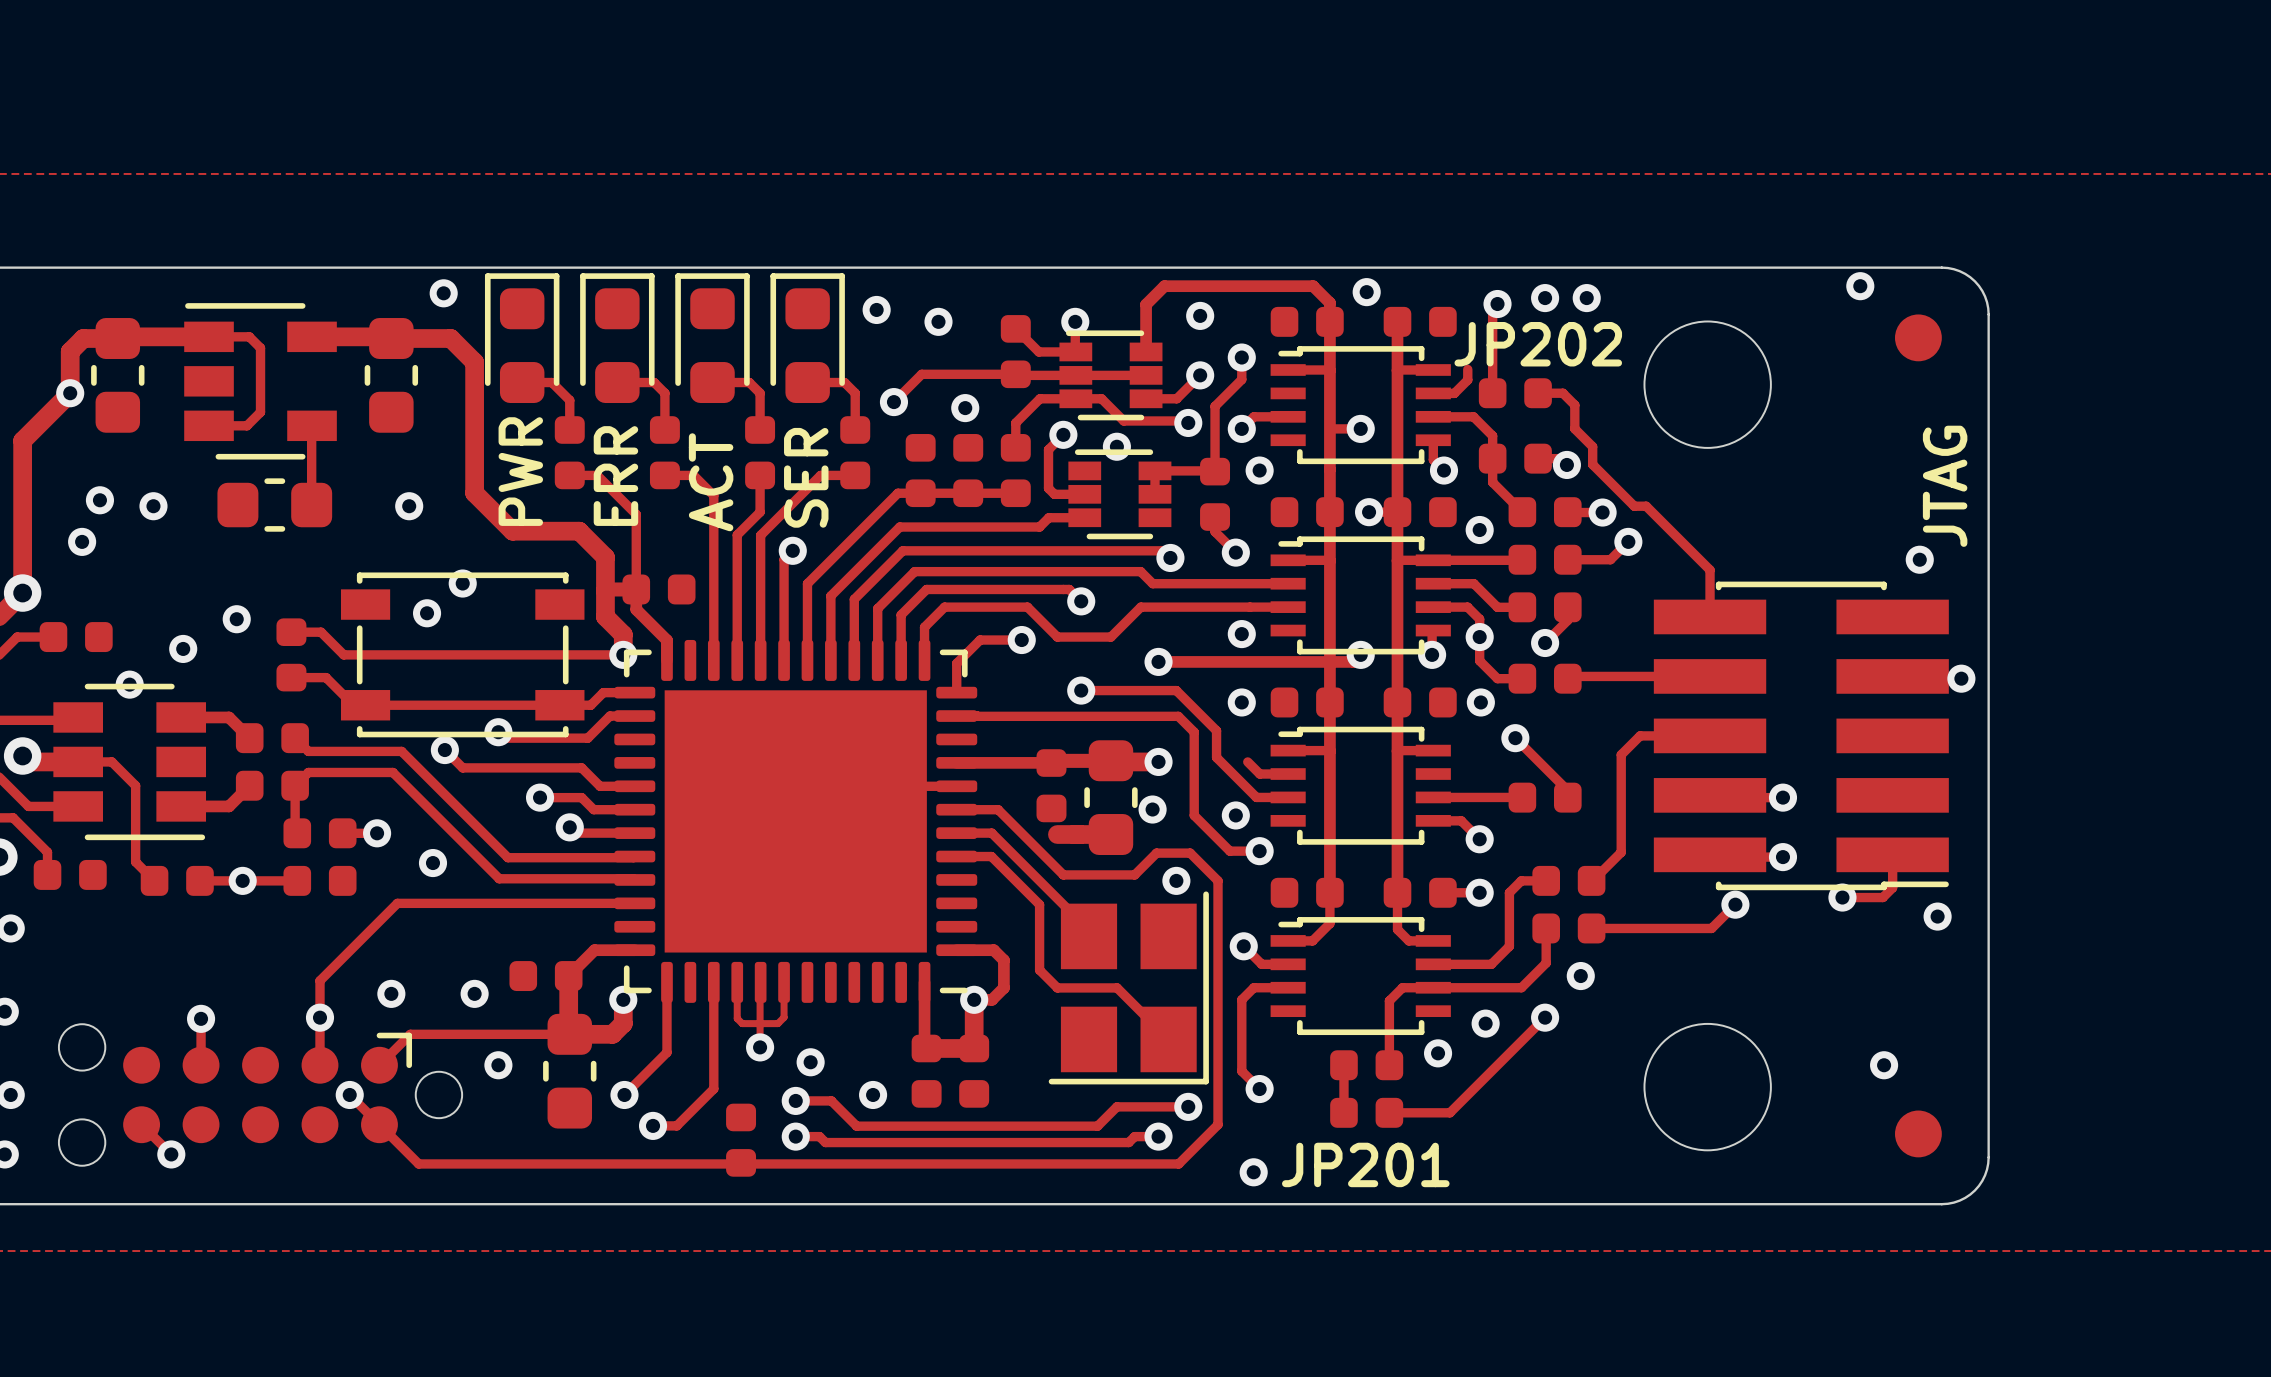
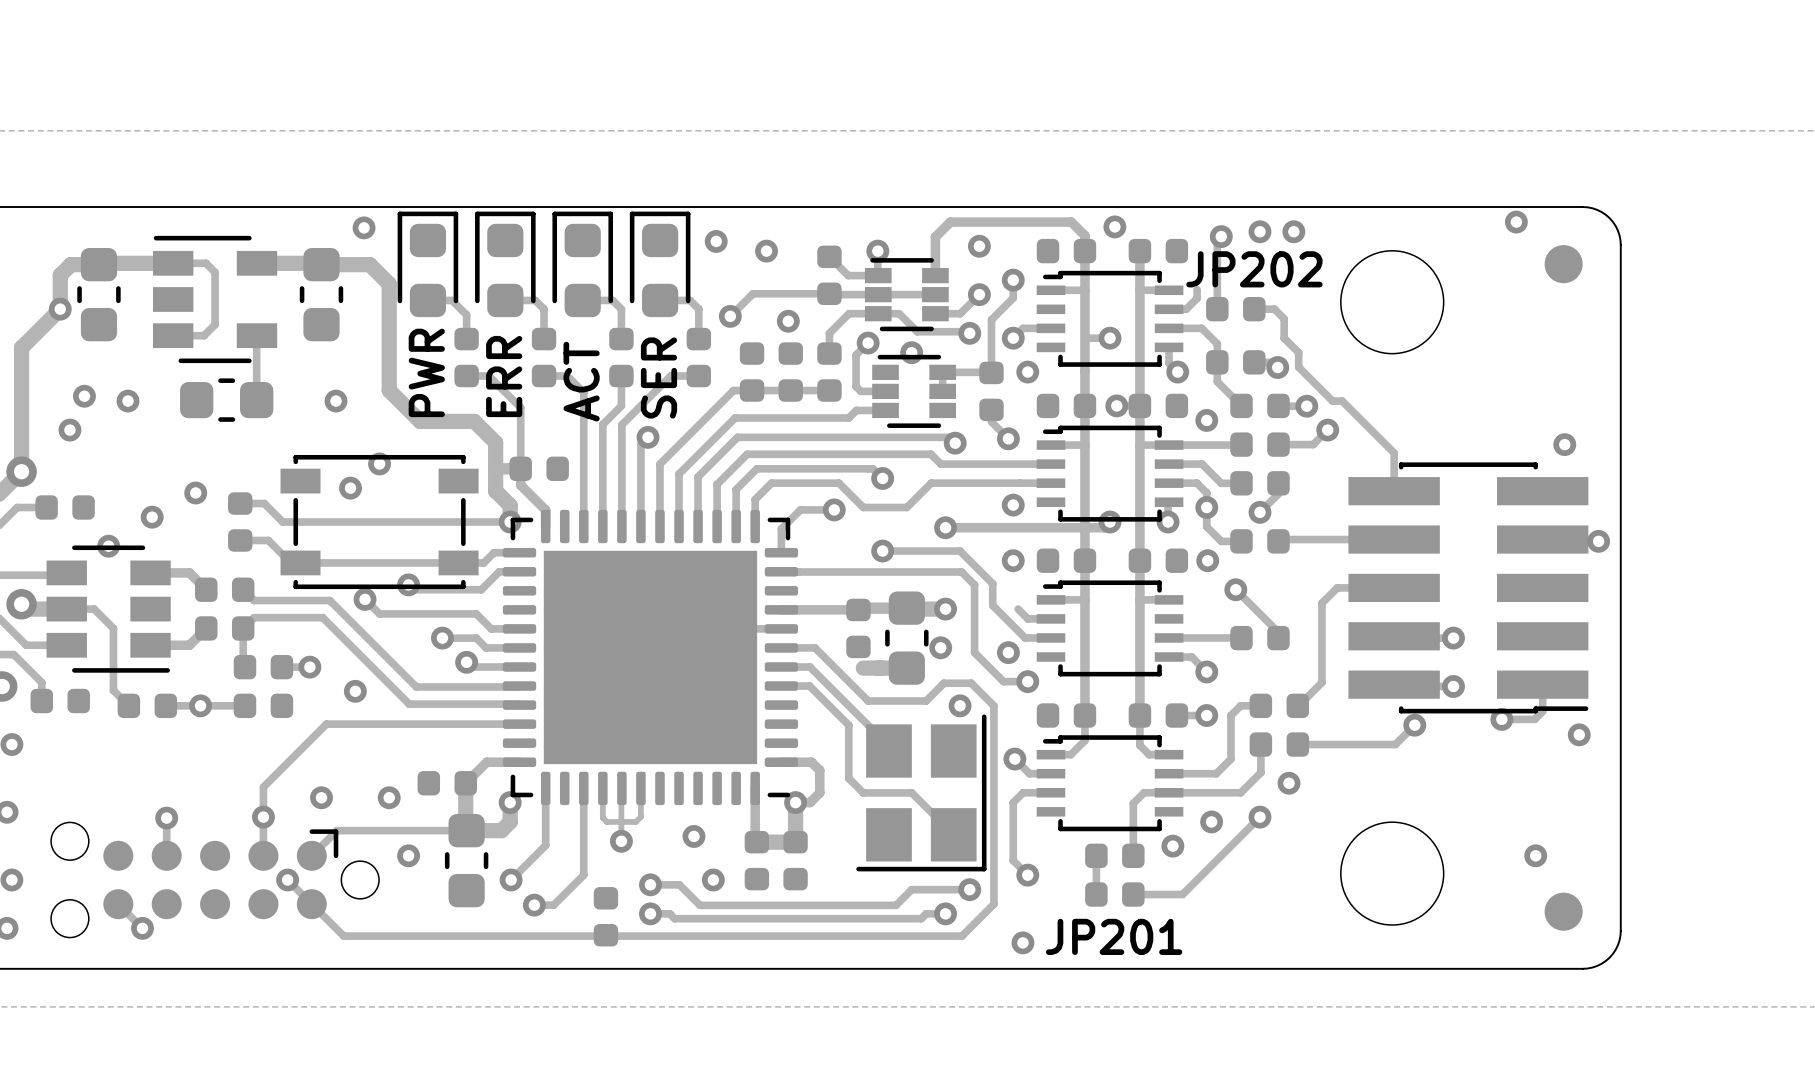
text: JTAG (1945, 486) -> none
via position: (810, 1062) -> (693, 836)

